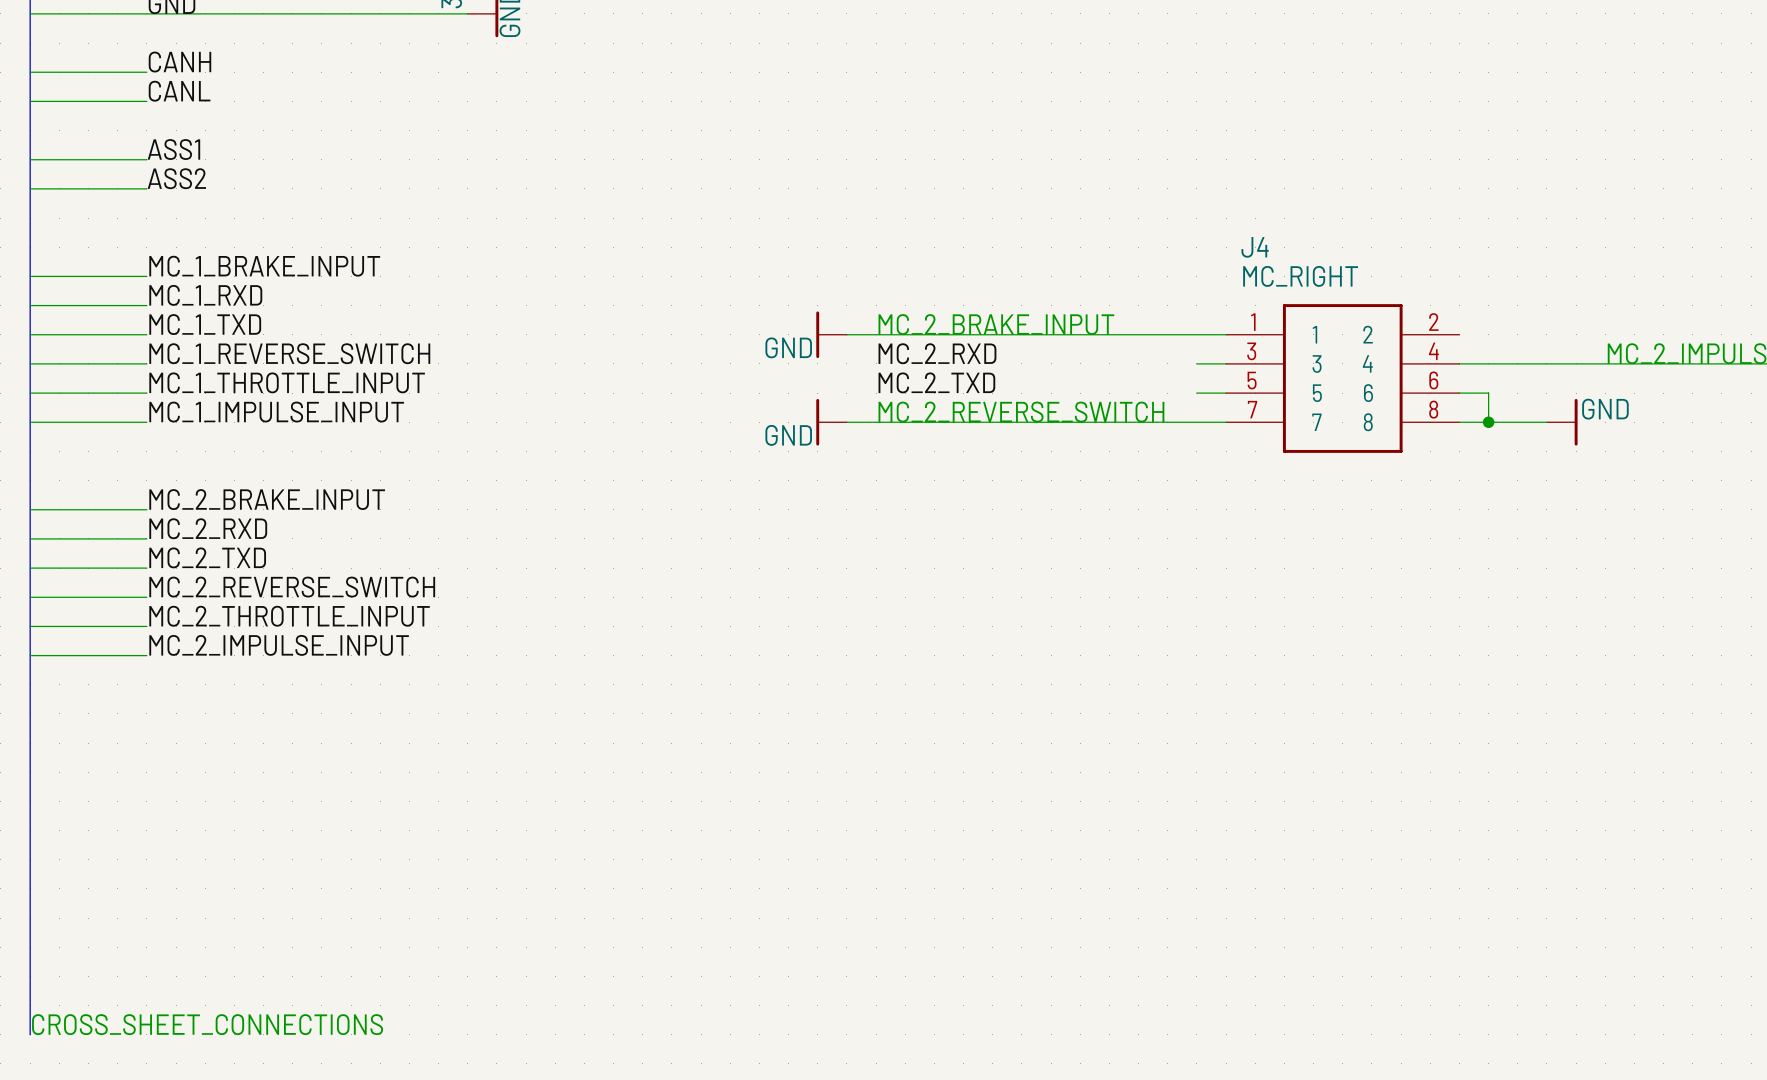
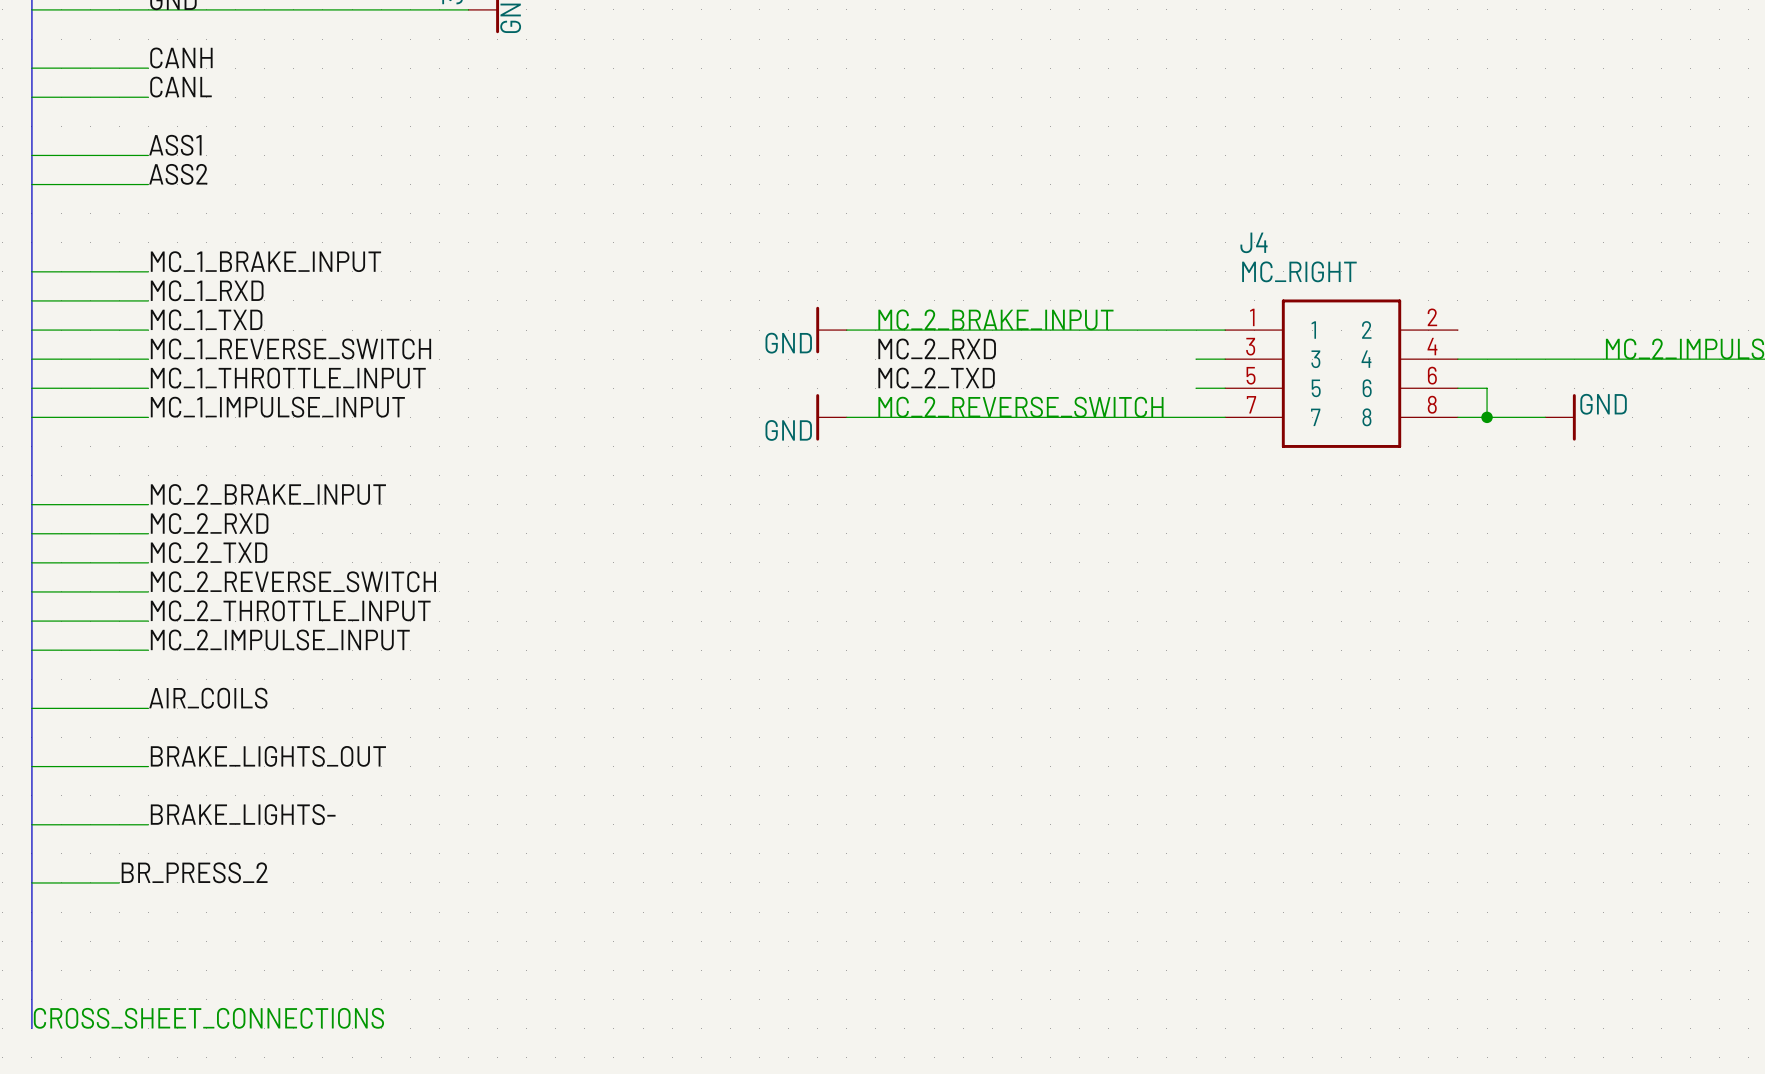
label: none -> AIR_COILS (208, 698)
wire: none -> (31, 708) (148, 708)
label: none -> BRAKE_LIGHTS_OUT (268, 756)
wire: none -> (31, 766) (148, 766)
label: none -> BRAKE_LIGHTS- (243, 814)
wire: none -> (31, 824) (148, 824)
label: none -> BR_PRESS_2 (194, 872)
wire: none -> (31, 882) (119, 882)

